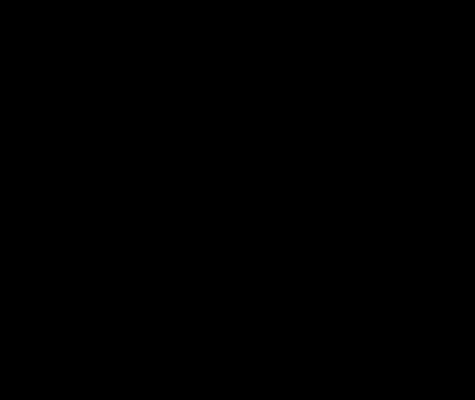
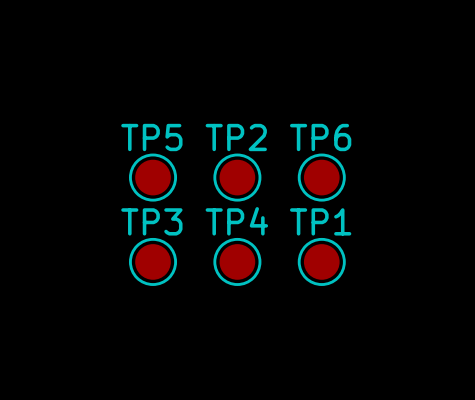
TP5: none -> (153, 177)
TP2: none -> (237, 177)
TP6: none -> (321, 177)
TP3: none -> (153, 261)
TP4: none -> (237, 261)
TP1: none -> (321, 261)

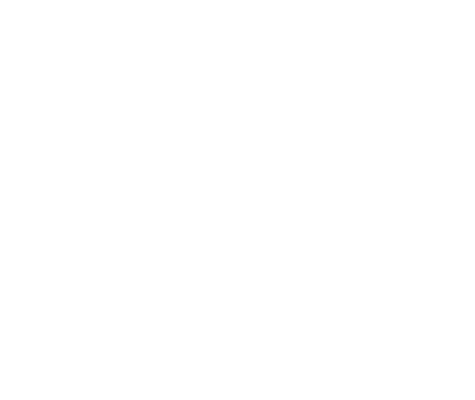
TP5: (153, 177) -> none
TP2: (237, 177) -> none
TP6: (321, 177) -> none
TP3: (153, 261) -> none
TP4: (237, 261) -> none
TP1: (321, 261) -> none

